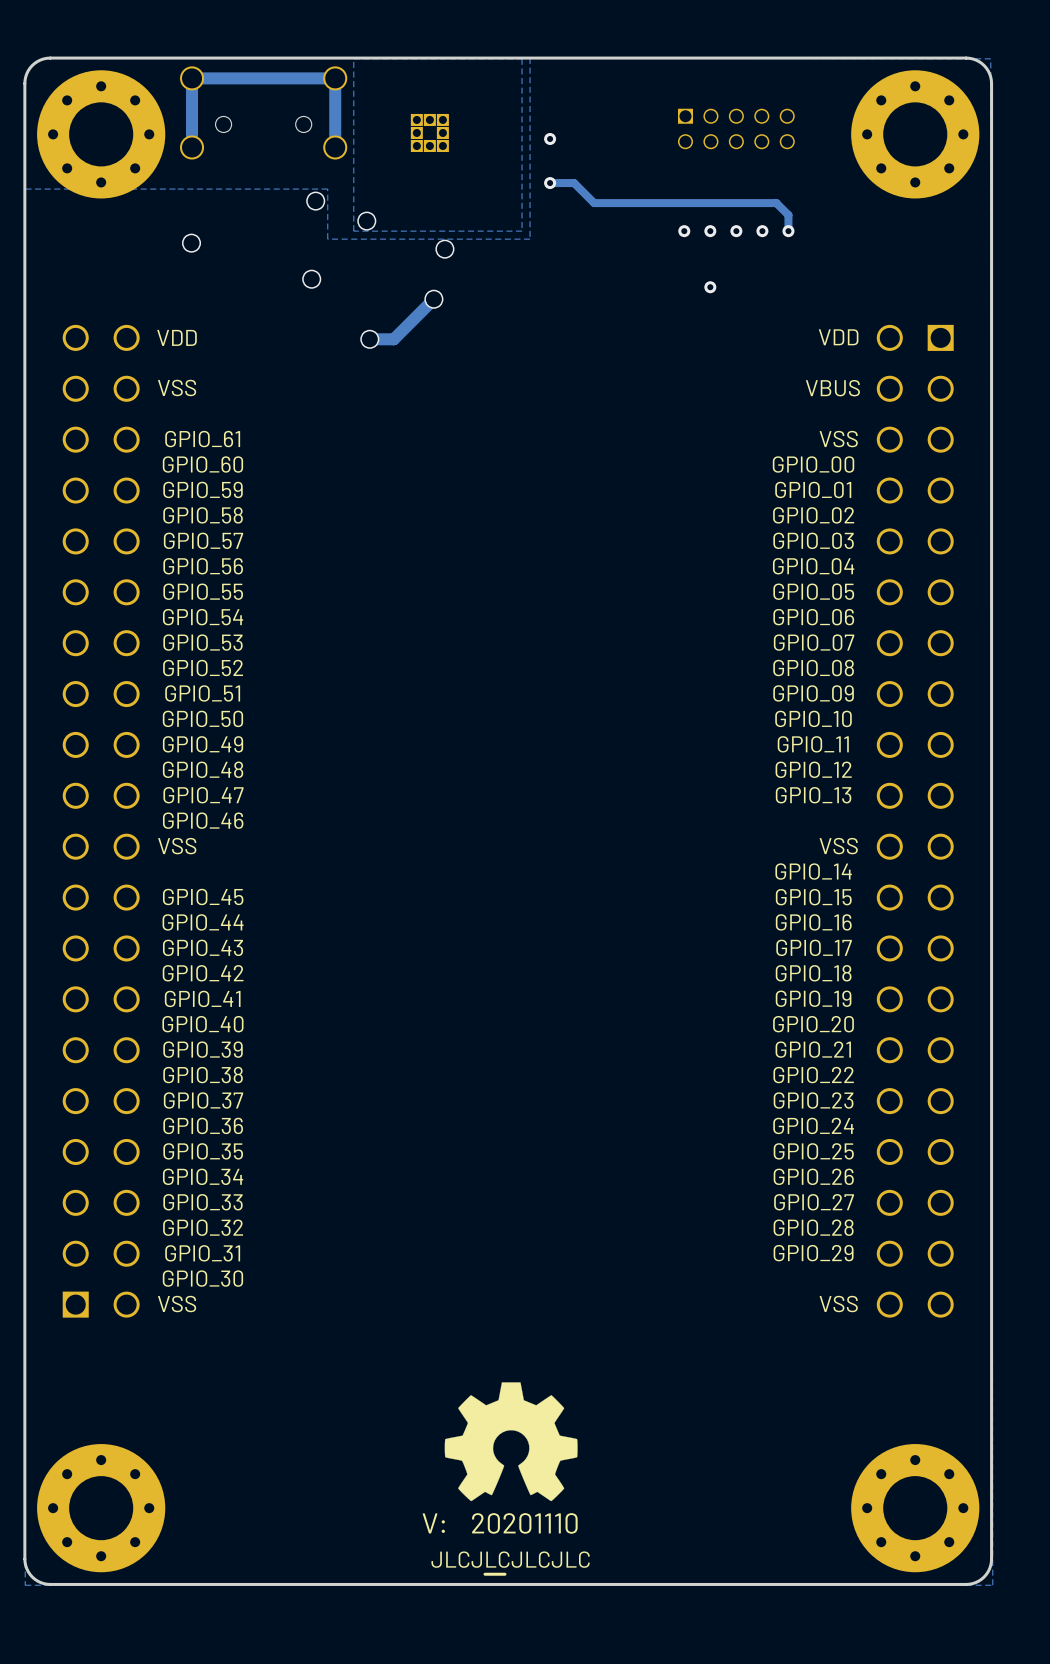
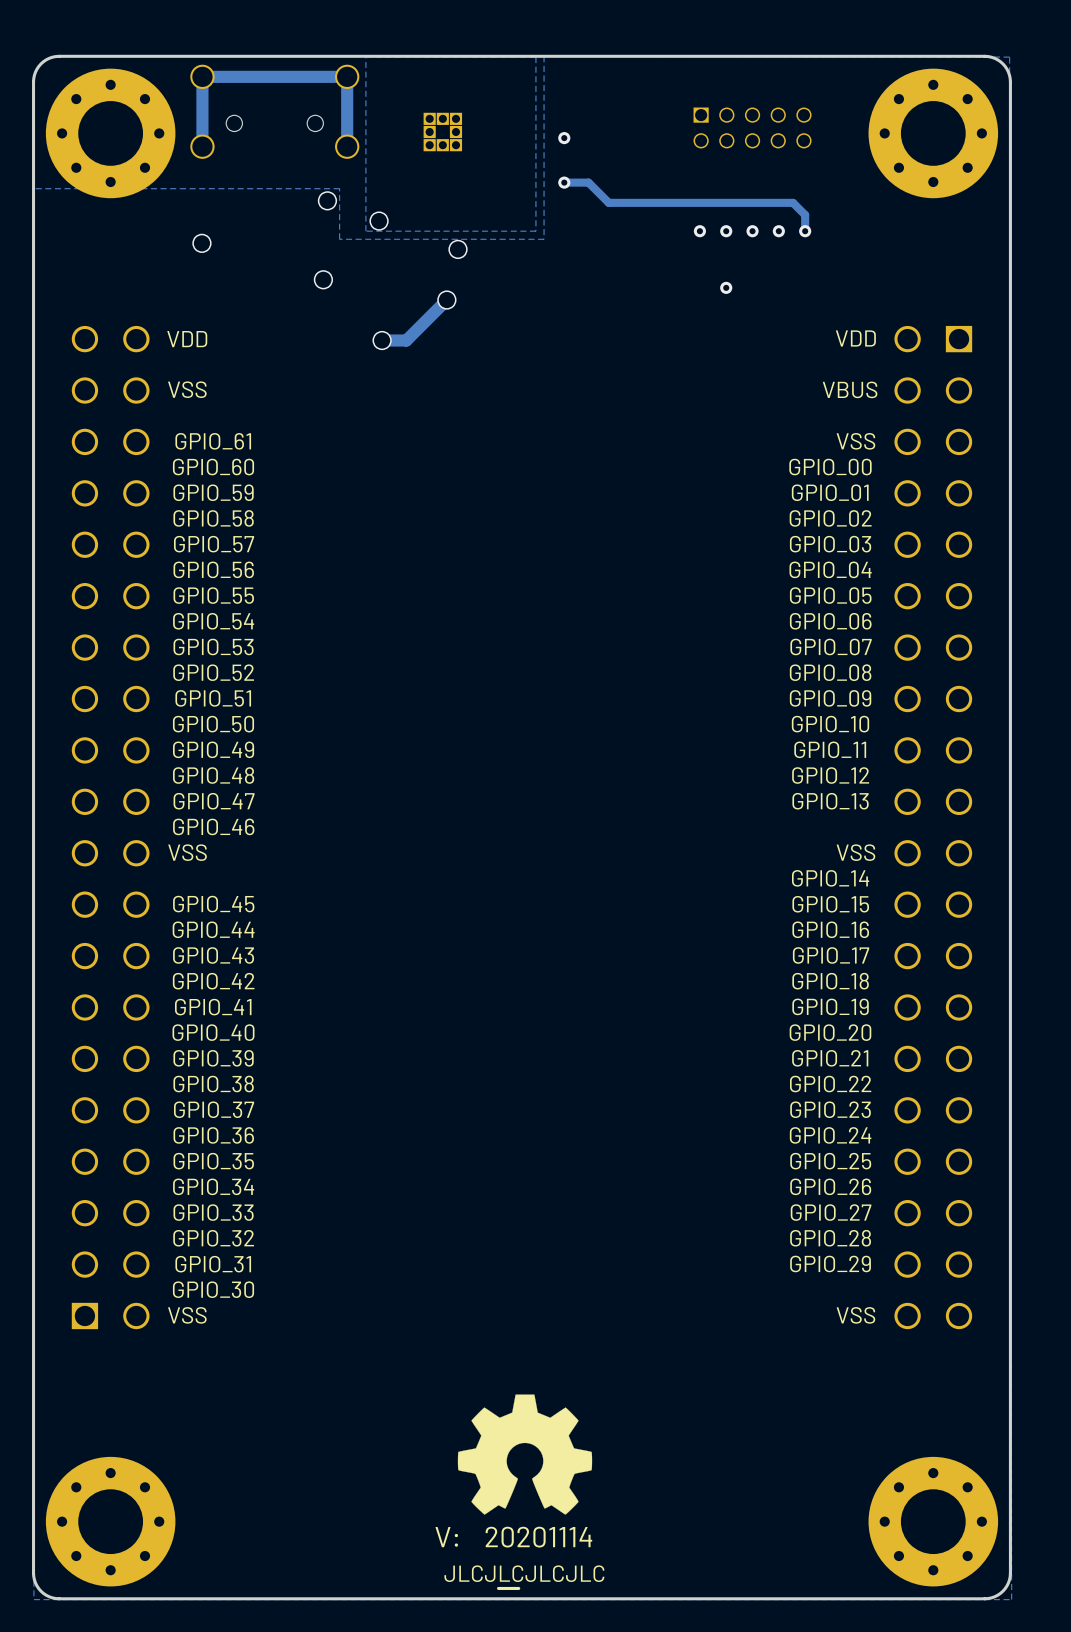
drawing shape: [422, 1513, 578, 1534] -> [435, 1526, 593, 1548]

